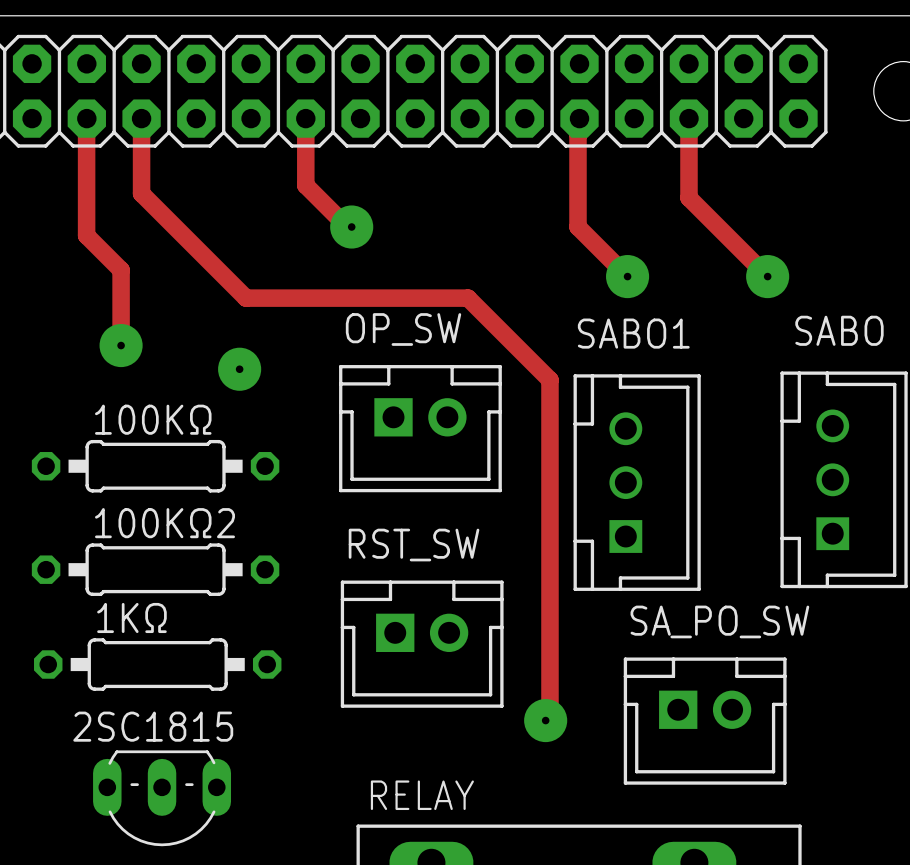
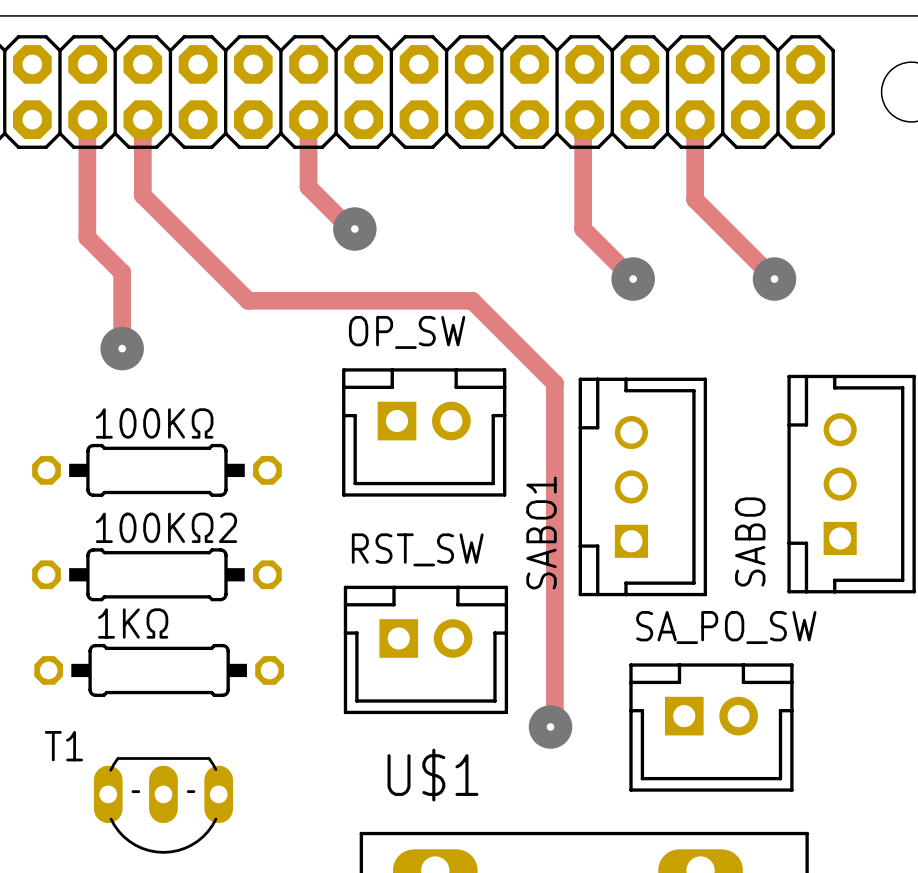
SABO name rotation: 0° (839, 330) -> 90° counterclockwise (750, 541)
SABO name position: SABO (839, 330) -> SABO (750, 541)
SABO1 name rotation: 0° (633, 333) -> 90° counterclockwise (541, 532)
SABO1 name position: SABO1 (633, 333) -> SABO1 (541, 532)
via: (239, 369) -> none
2SC1815 name: 2SC1815 (153, 726) -> T1 (63, 746)
RELAY name: RELAY (422, 795) -> U$1 (432, 775)

